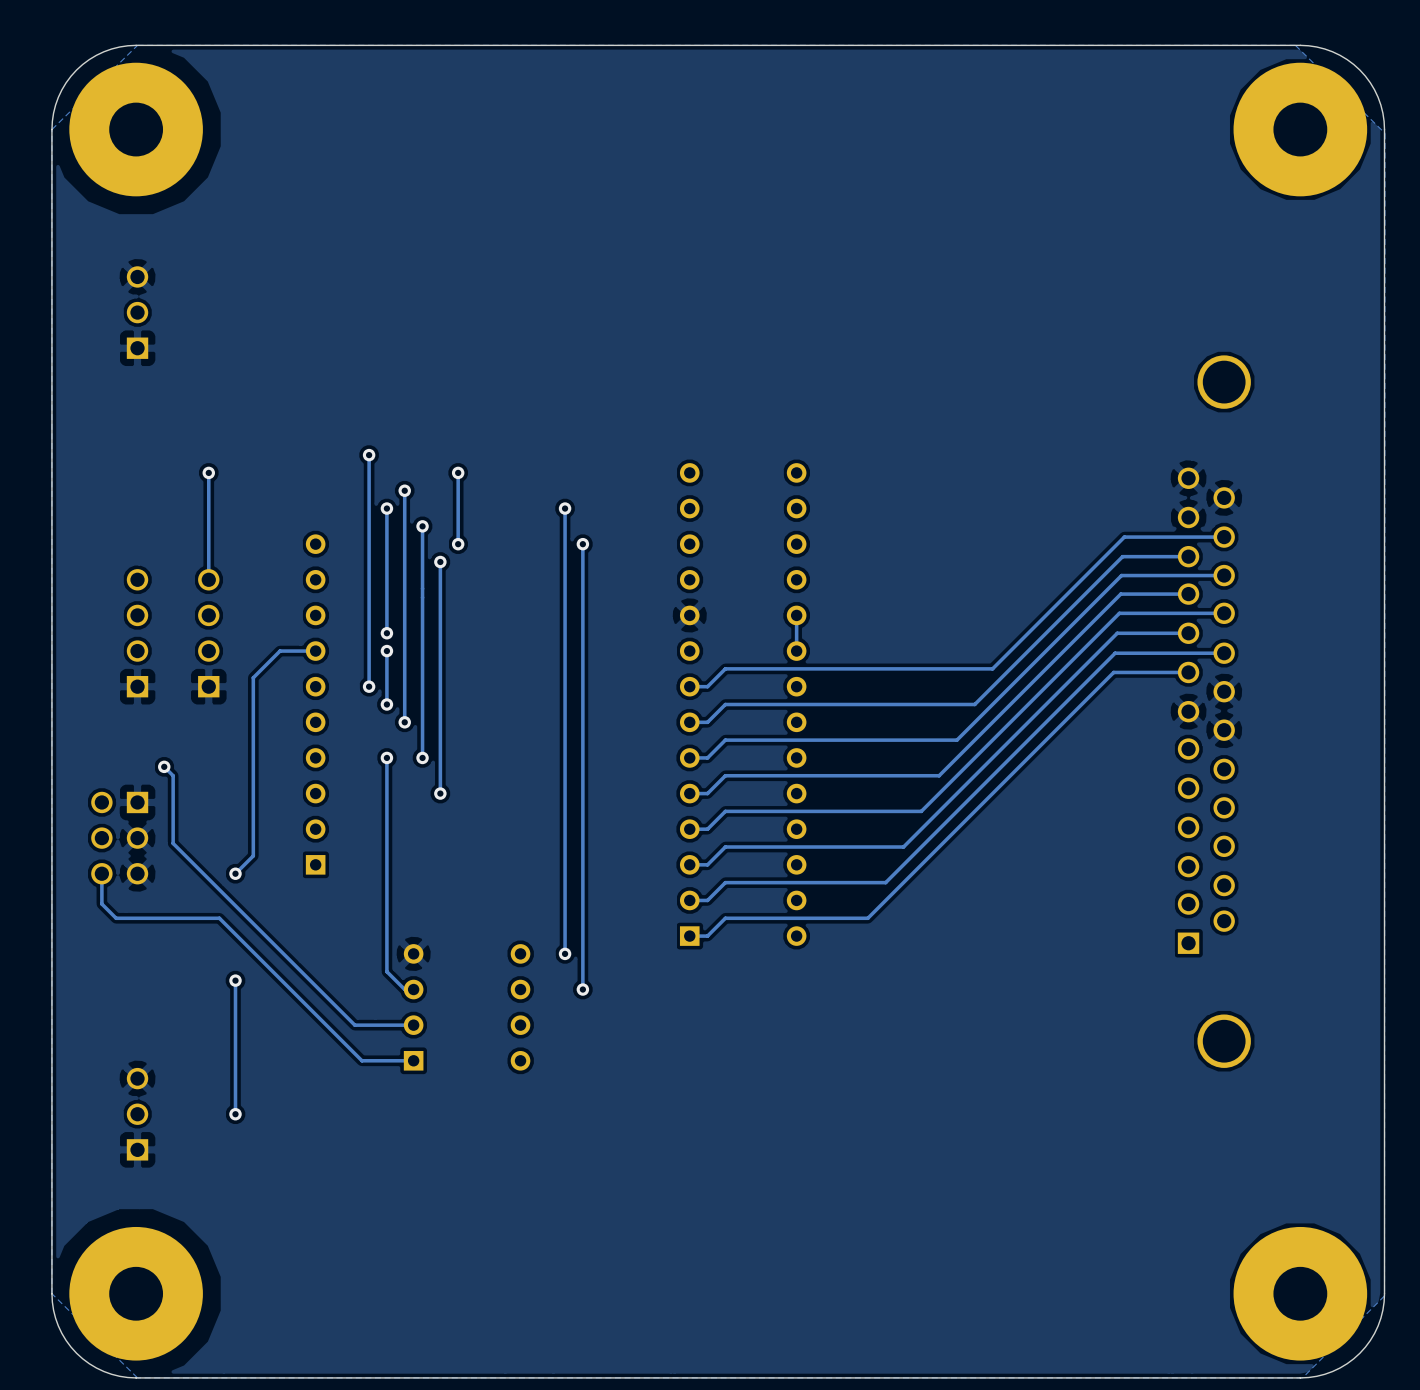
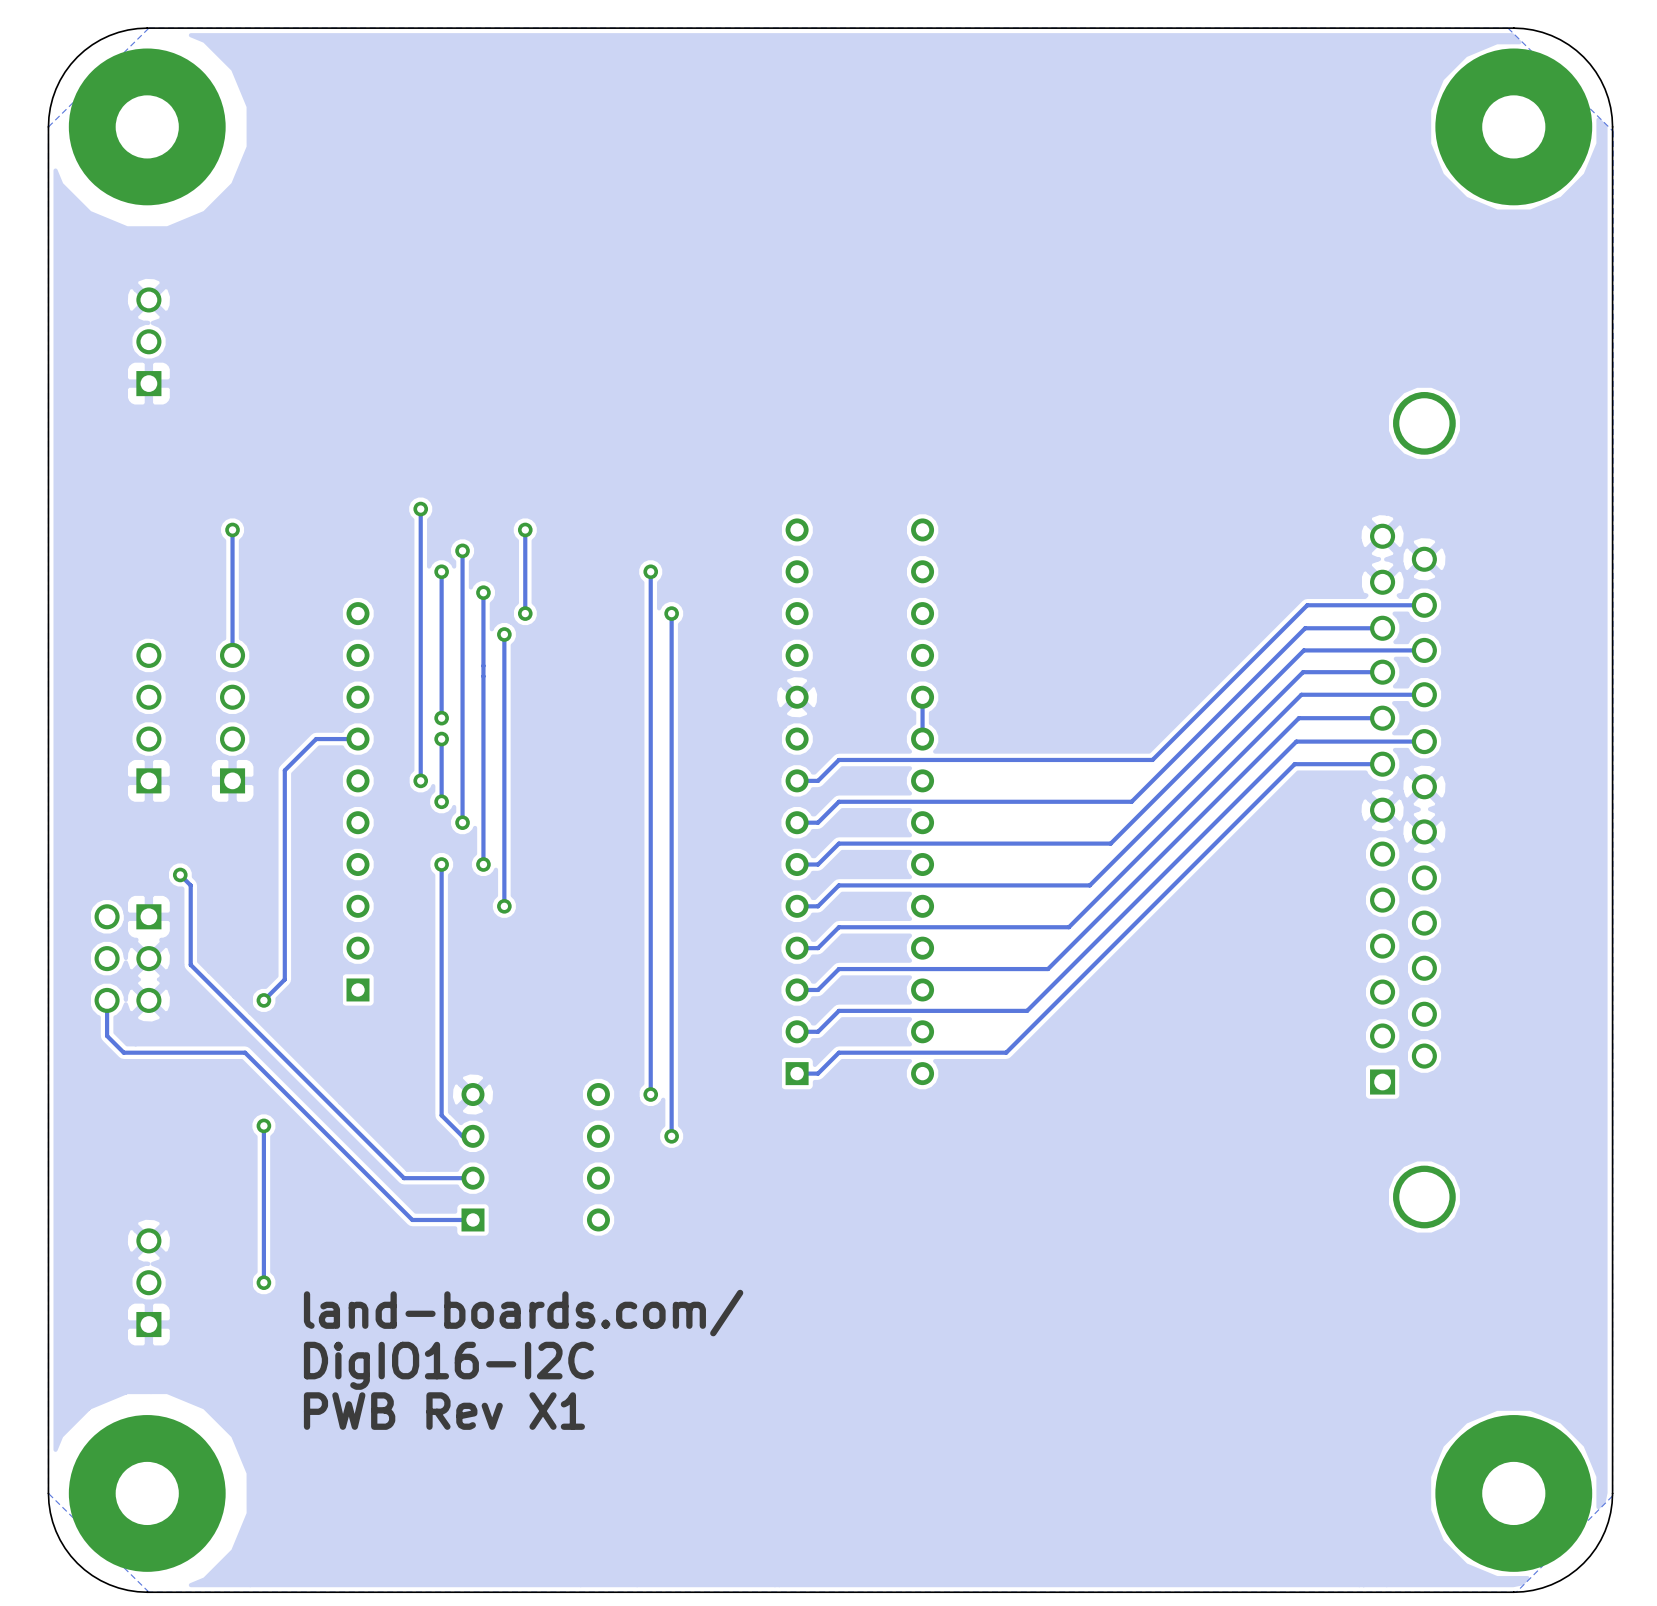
text: none -> land-boards.com/ (523, 1313)
text: none -> DigIO16-I2C (448, 1365)
text: none -> PWB Rev X1 (444, 1411)

